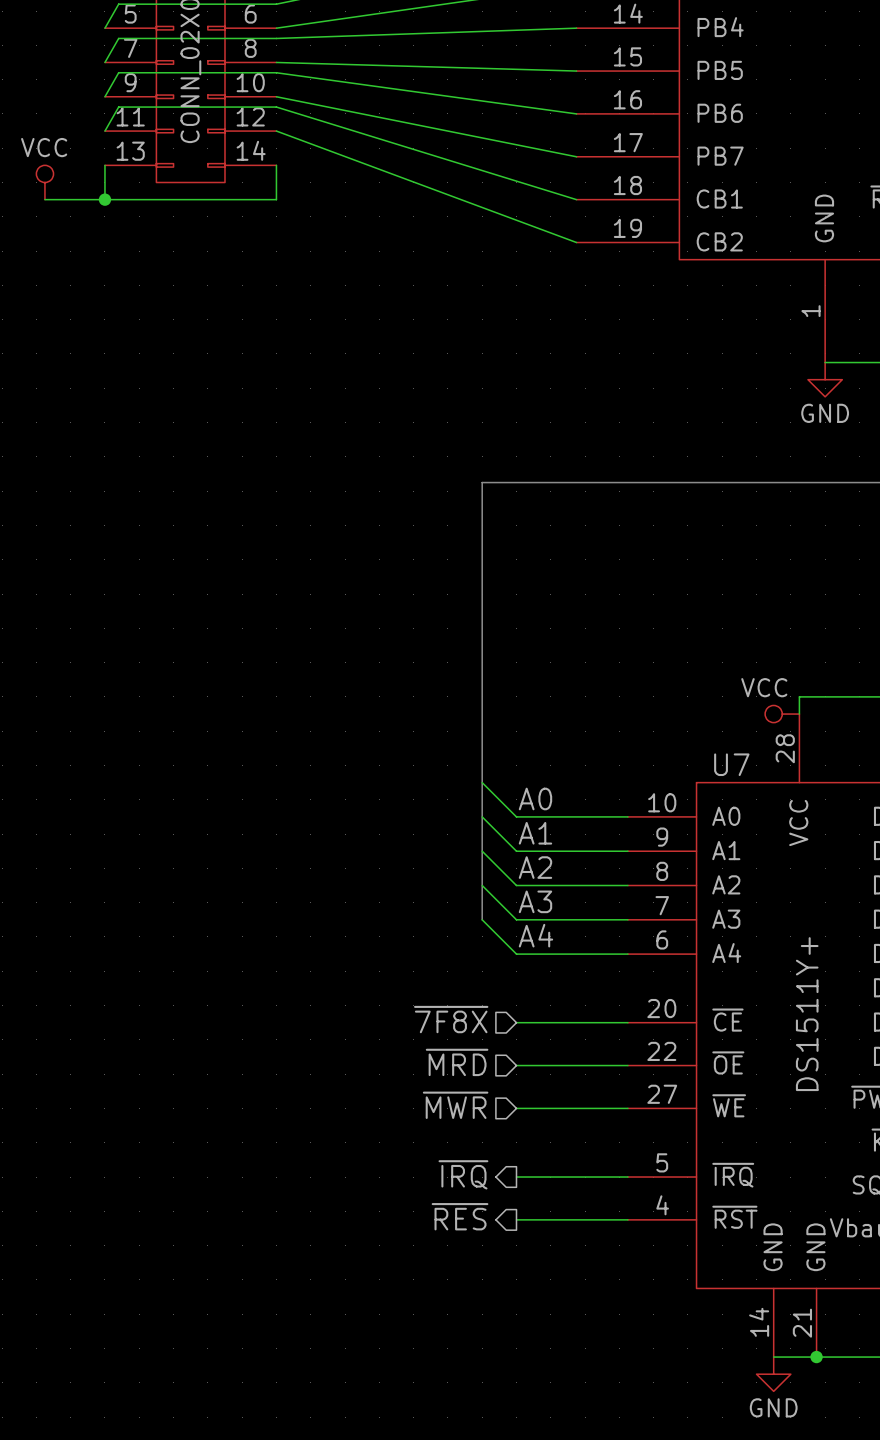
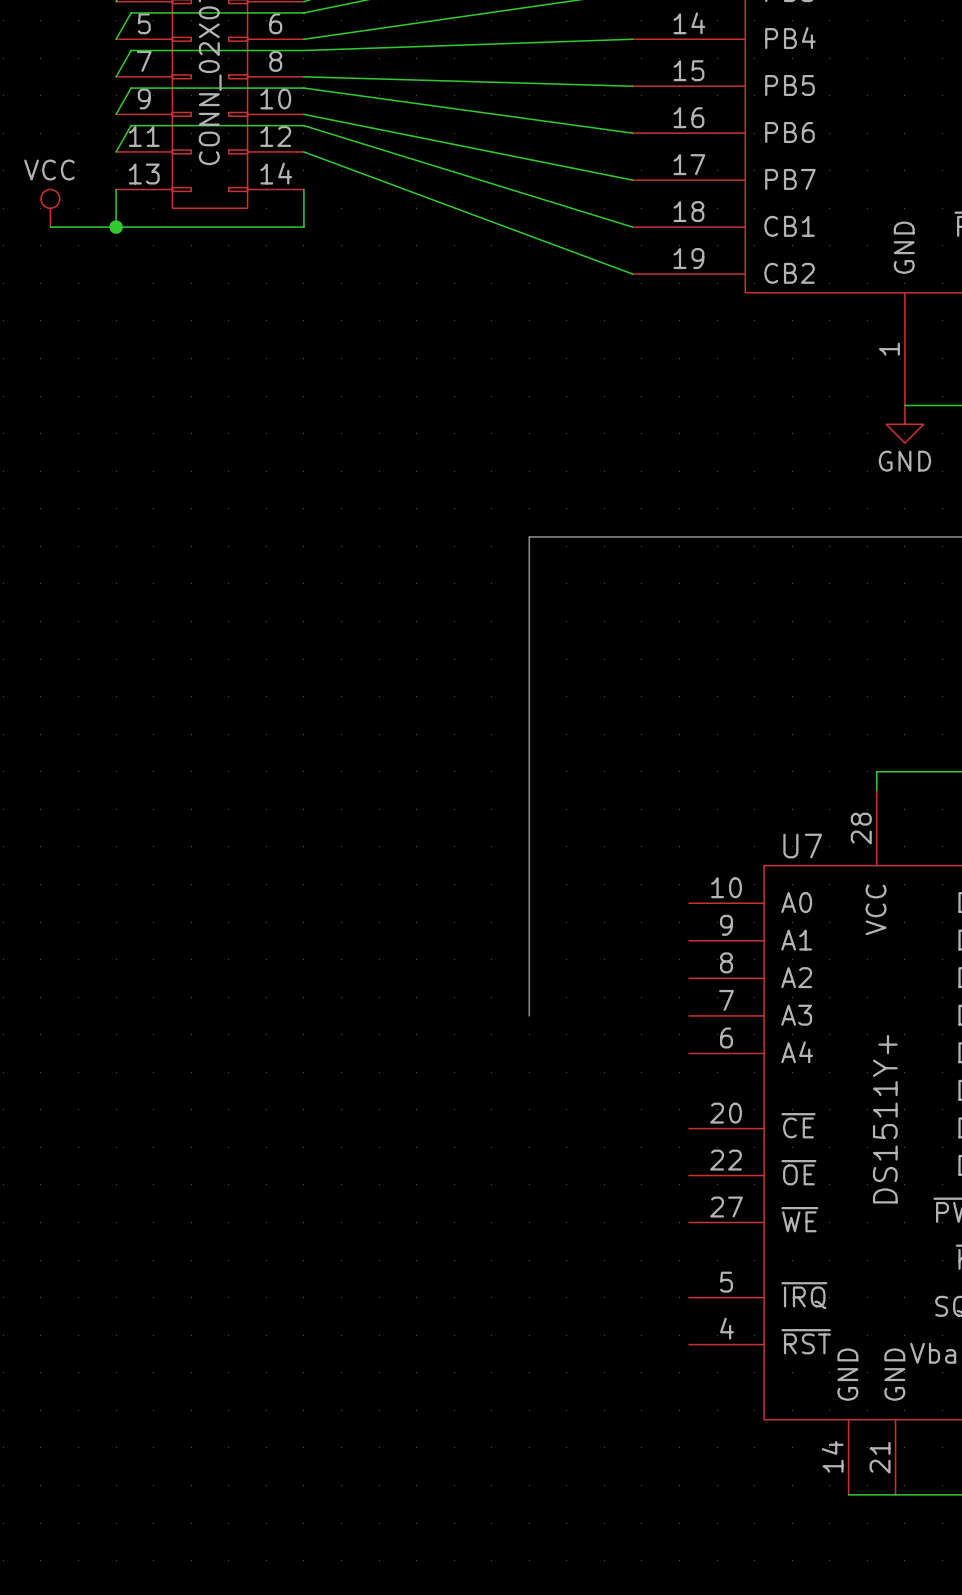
power symbol: VCC (782, 714) -> none
wire: (482, 782) (516, 816) (627, 816) -> none
label: A0 (535, 798) -> none
wire: (482, 816) (516, 851) (627, 851) -> none
label: A1 (535, 833) -> none
wire: (482, 851) (516, 885) (627, 885) -> none
label: A2 (535, 867) -> none
wire: (482, 885) (516, 919) (627, 919) -> none
label: A3 (535, 901) -> none
wire: (482, 919) (516, 954) (627, 954) -> none
label: A4 (535, 935) -> none
hierarchical label: ~{7F8X} (451, 1019) -> none
wire: (516, 1022) (627, 1022) -> none
hierarchical label: ~{MRD} (457, 1062) -> none
wire: (516, 1065) (627, 1065) -> none
hierarchical label: ~{MWR} (455, 1105) -> none
wire: (516, 1108) (627, 1108) -> none
hierarchical label: ~{IRQ} (463, 1174) -> none
wire: (516, 1177) (627, 1177) -> none
hierarchical label: ~{RES} (460, 1216) -> none
wire: (516, 1219) (627, 1219) -> none
junction: (816, 1357) -> none
power symbol: GND (773, 1374) -> none

